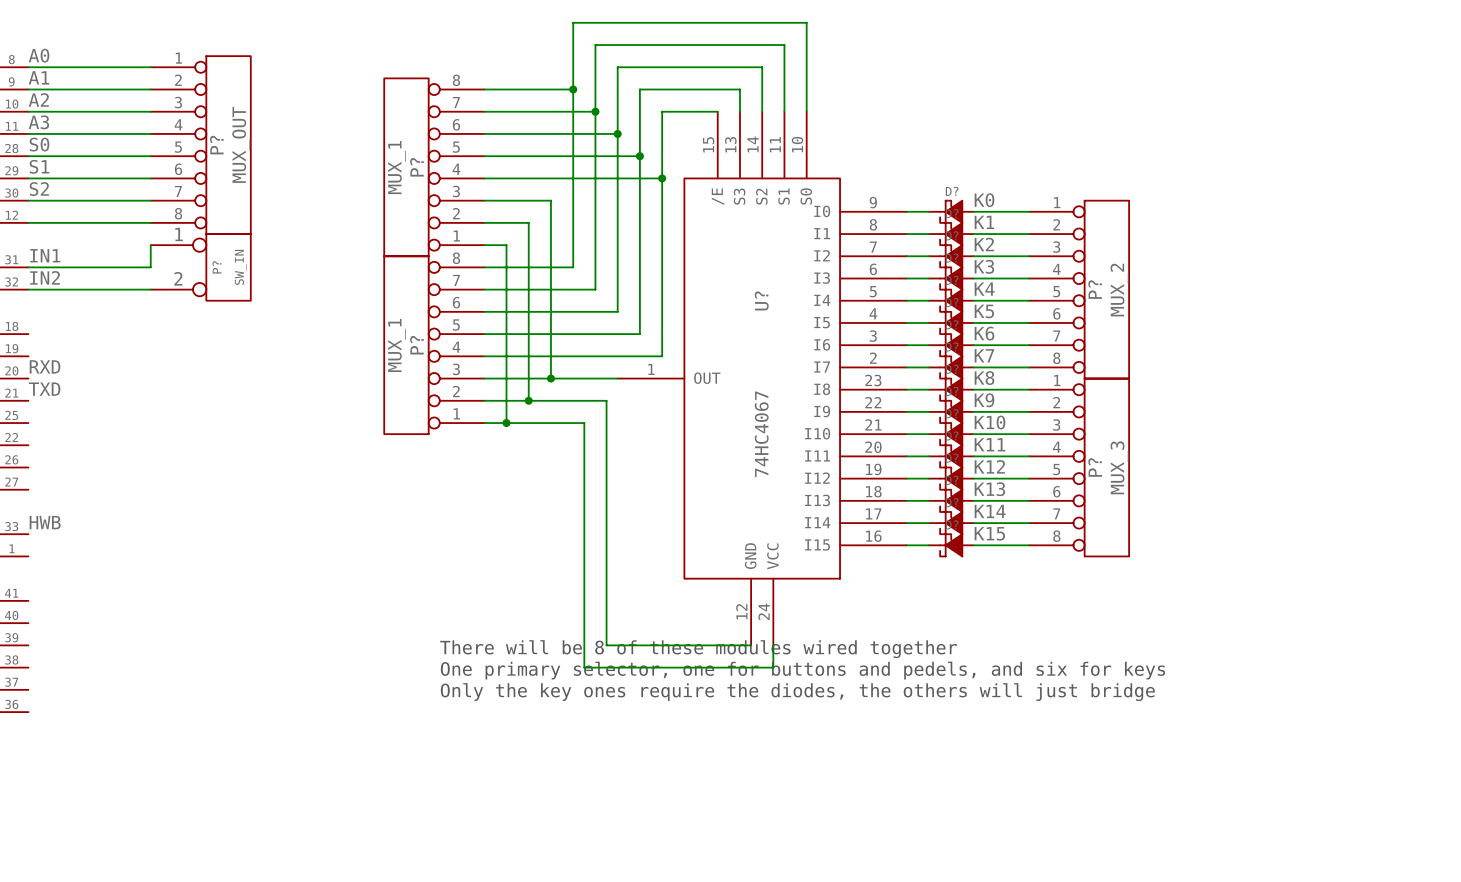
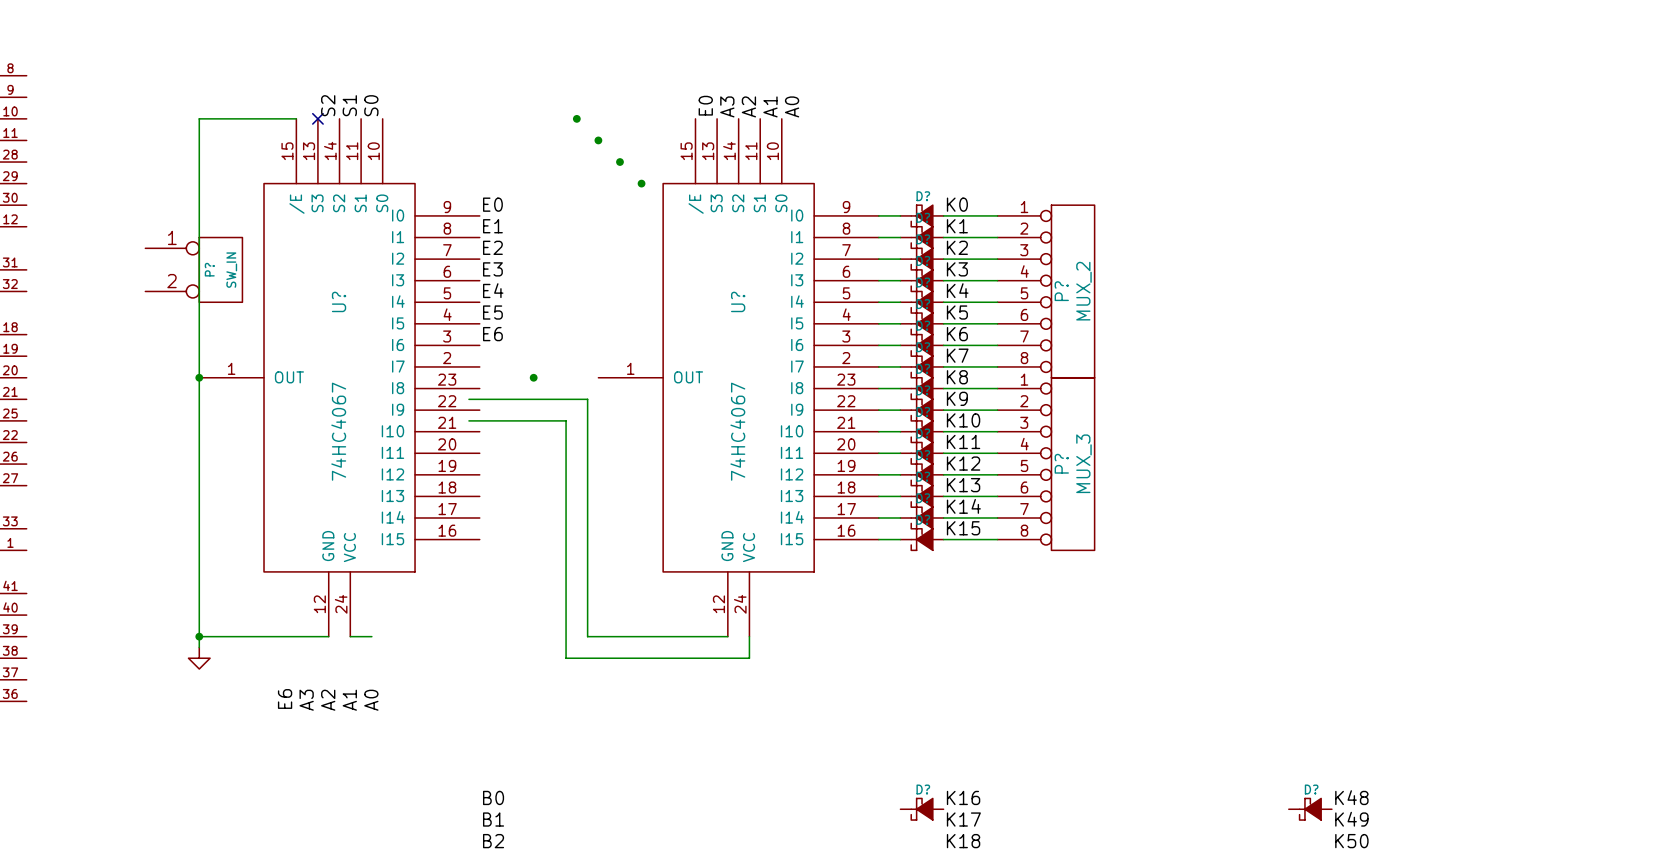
label: A0 (39, 55) -> none
wire: (28, 67) (150, 67) -> none
label: A1 (39, 77) -> none
wire: (28, 89) (150, 89) -> none
wire: (484, 89) (573, 89) -> none
junction: (573, 89) -> none
label: A2 (38, 99) -> none
label: none -> S2 (328, 105)
label: none -> S1 (349, 105)
label: none -> S0 (371, 105)
label: none -> E0 (705, 105)
label: none -> A3 (727, 106)
label: none -> A2 (748, 106)
label: none -> A1 (770, 106)
label: none -> A0 (792, 106)
wire: (28, 111) (150, 111) -> none
wire: none -> (296, 118) (199, 118) (199, 647)
no-connect mark: none -> (317, 118)
wire: (484, 111) (595, 111) -> none
wire: (717, 111) (662, 111) (662, 356) (484, 356) -> none
wire: (739, 111) (739, 89) (639, 89) (639, 334) (484, 334) -> none
wire: (762, 111) (762, 67) (617, 67) (617, 311) (484, 311) -> none
wire: (784, 111) (784, 45) (595, 45) (595, 289) (484, 289) -> none
wire: (806, 111) (806, 22) (573, 22) (573, 267) (484, 267) -> none
label: A3 (38, 122) -> none
wire: (28, 133) (150, 133) -> none
wire: (484, 133) (617, 133) -> none
label: S0 (39, 144) -> none
P?: MUX_OUT (200, 145) -> none
wire: (28, 156) (150, 156) -> none
wire: (484, 156) (639, 156) -> none
label: S1 (39, 166) -> none
P?: MUX_1 (434, 167) -> none
wire: (28, 178) (150, 178) -> none
wire: (484, 178) (662, 178) -> none
label: S2 (39, 189) -> none
wire: (28, 200) (150, 200) -> none
wire: (484, 200) (550, 200) (550, 378) -> none
label: none -> E0 (492, 204)
wire: (28, 222) (150, 222) -> none
wire: (484, 222) (528, 222) (528, 400) -> none
label: none -> E1 (492, 226)
label: none -> E2 (492, 247)
wire: (150, 245) (150, 267) (28, 267) -> none
wire: (484, 245) (506, 245) (506, 423) -> none
label: IN1 (45, 255) -> none
label: none -> E3 (492, 269)
label: IN2 (45, 277) -> none
wire: (28, 289) (150, 289) -> none
label: none -> E4 (493, 290)
label: none -> E5 (492, 312)
label: none -> E6 (492, 334)
P?: MUX_1 (434, 345) -> none
label: RXD (45, 366) -> none
junction: none -> (199, 377)
U?: none -> 74HC4067 (339, 377)
wire: (484, 378) (617, 378) -> none
label: TXD (44, 389) -> none
junction: (528, 400) -> none
junction: (506, 423) -> none
label: HWB (45, 522) -> none
wire: none -> (199, 636) (328, 636)
junction: none -> (199, 636)
wire: none -> (350, 636) (371, 636)
text: There will be 8 of these modules wired together (698, 649) -> none
power symbol: none -> (199, 658)
text: One primary selector, one for buttons and pedels, and six for keys (802, 670) -> none
text: Only the key ones require the diodes, the others will just bridge (797, 692) -> none
label: none -> E6 (285, 698)
label: none -> A3 (306, 700)
label: none -> A2 (328, 700)
label: none -> A1 (349, 700)
label: none -> A0 (371, 700)
label: none -> B0 (493, 797)
label: none -> K16 (963, 797)
label: none -> K48 (1351, 797)
D?: none -> (922, 809)
D?: none -> (1310, 809)
label: none -> B1 (493, 819)
label: none -> K17 (963, 819)
label: none -> K49 (1351, 819)
label: none -> B2 (493, 841)
label: none -> K18 (963, 841)
label: none -> K50 (1351, 841)

